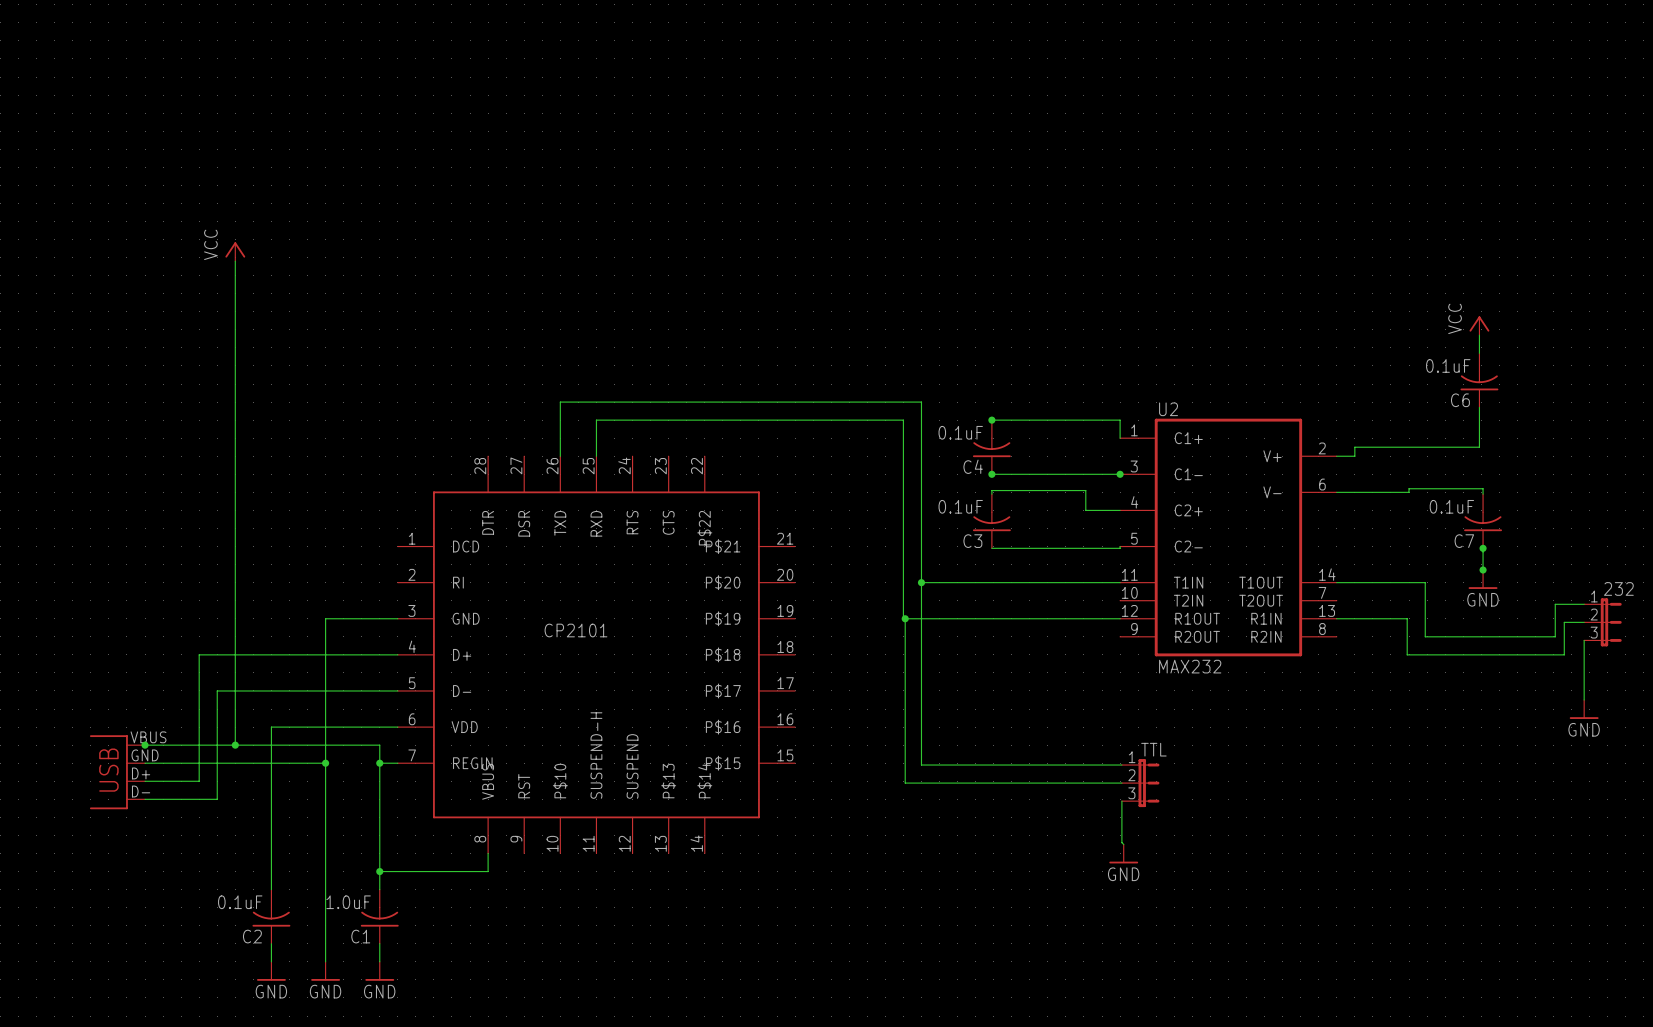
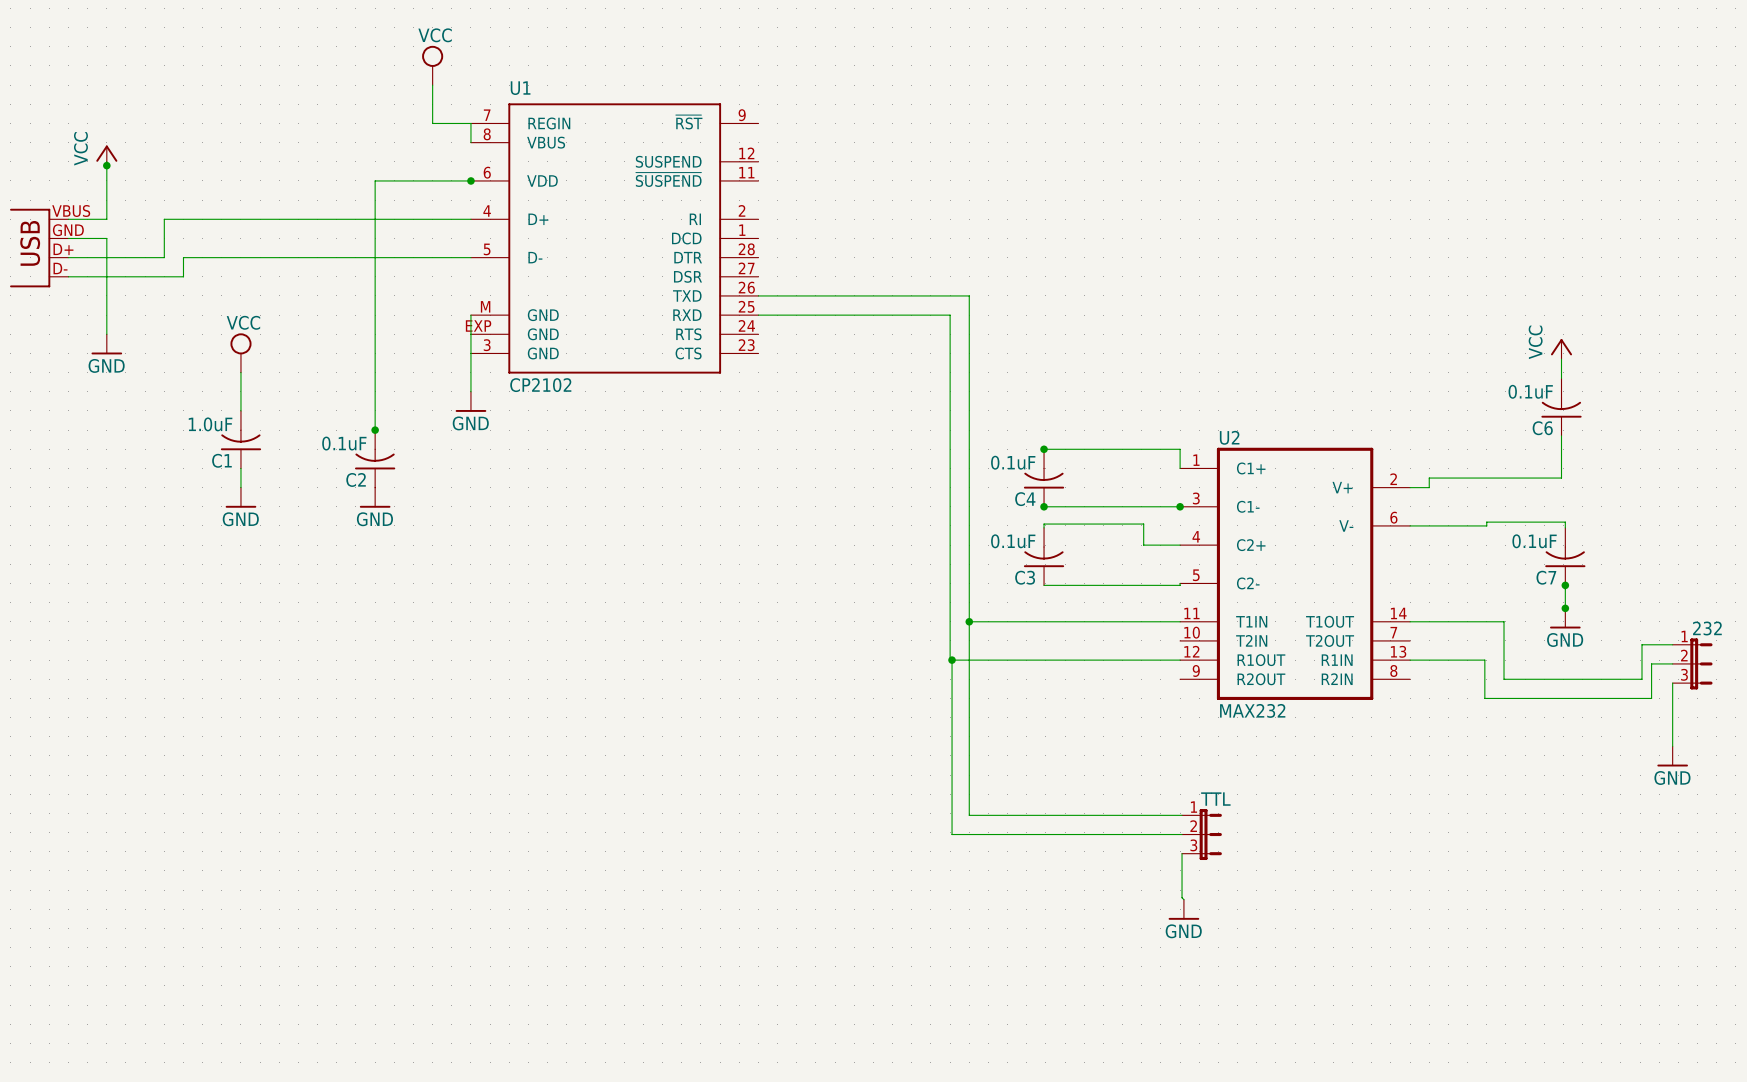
power symbol: none -> VCC (432, 65)
wire: none -> (432, 85) (432, 123) (470, 123) (470, 142)
wire: none -> (106, 161) (106, 219) (68, 219)
junction: none -> (106, 165)
wire: none -> (470, 180) (375, 180) (375, 430)
junction: none -> (470, 180)
wire: none -> (470, 219) (164, 219) (164, 257) (68, 257)
wire: none -> (68, 238) (106, 238) (106, 334)
U1: none -> CP2102 (614, 238)
part: none -> (39, 248)
wire: none -> (470, 257) (183, 257) (183, 276) (68, 276)
power symbol position: VCC (235, 251) -> VCC (106, 155)
wire: (235, 261) (235, 347) -> none
wire: none -> (470, 315) (470, 391)
power symbol: none -> GND (106, 344)
power symbol: none -> VCC (240, 352)
power symbol: none -> GND (470, 401)
junction: none -> (375, 430)
wire: (921, 402) (560, 402) (560, 456) -> (969, 430) (969, 295) (758, 295)
wire: (903, 420) (596, 420) (596, 456) -> (950, 449) (950, 315) (758, 315)
wire: (235, 456) (235, 745) -> none
power symbol: none -> GND (240, 497)
power symbol: none -> GND (375, 497)
wire: (397, 618) (325, 618) (325, 961) -> none
wire: (397, 654) (199, 654) (199, 781) (145, 781) -> none
part: CP2101 (596, 654) -> none
wire: (397, 690) (217, 690) (217, 799) (145, 799) -> none
wire: (397, 727) (271, 727) (271, 889) -> none
wire: (143, 745) (379, 745) (379, 889) -> none
junction: (145, 745) -> none
junction: (235, 745) -> none
wire: (145, 763) (325, 763) -> none
junction: (325, 763) -> none
wire: (379, 763) (397, 763) -> none
junction: (379, 763) -> none
part: (117, 772) -> none
wire: (488, 853) (488, 871) (379, 871) -> none
junction: (379, 871) -> none
C2 position: (271, 916) -> (375, 458)
C1 position: (379, 916) -> (240, 439)
wire: (271, 943) (271, 961) -> none
wire: (379, 943) (379, 961) -> none
power symbol: GND (271, 971) -> none
power symbol: GND (325, 971) -> none
power symbol: GND (379, 971) -> none

